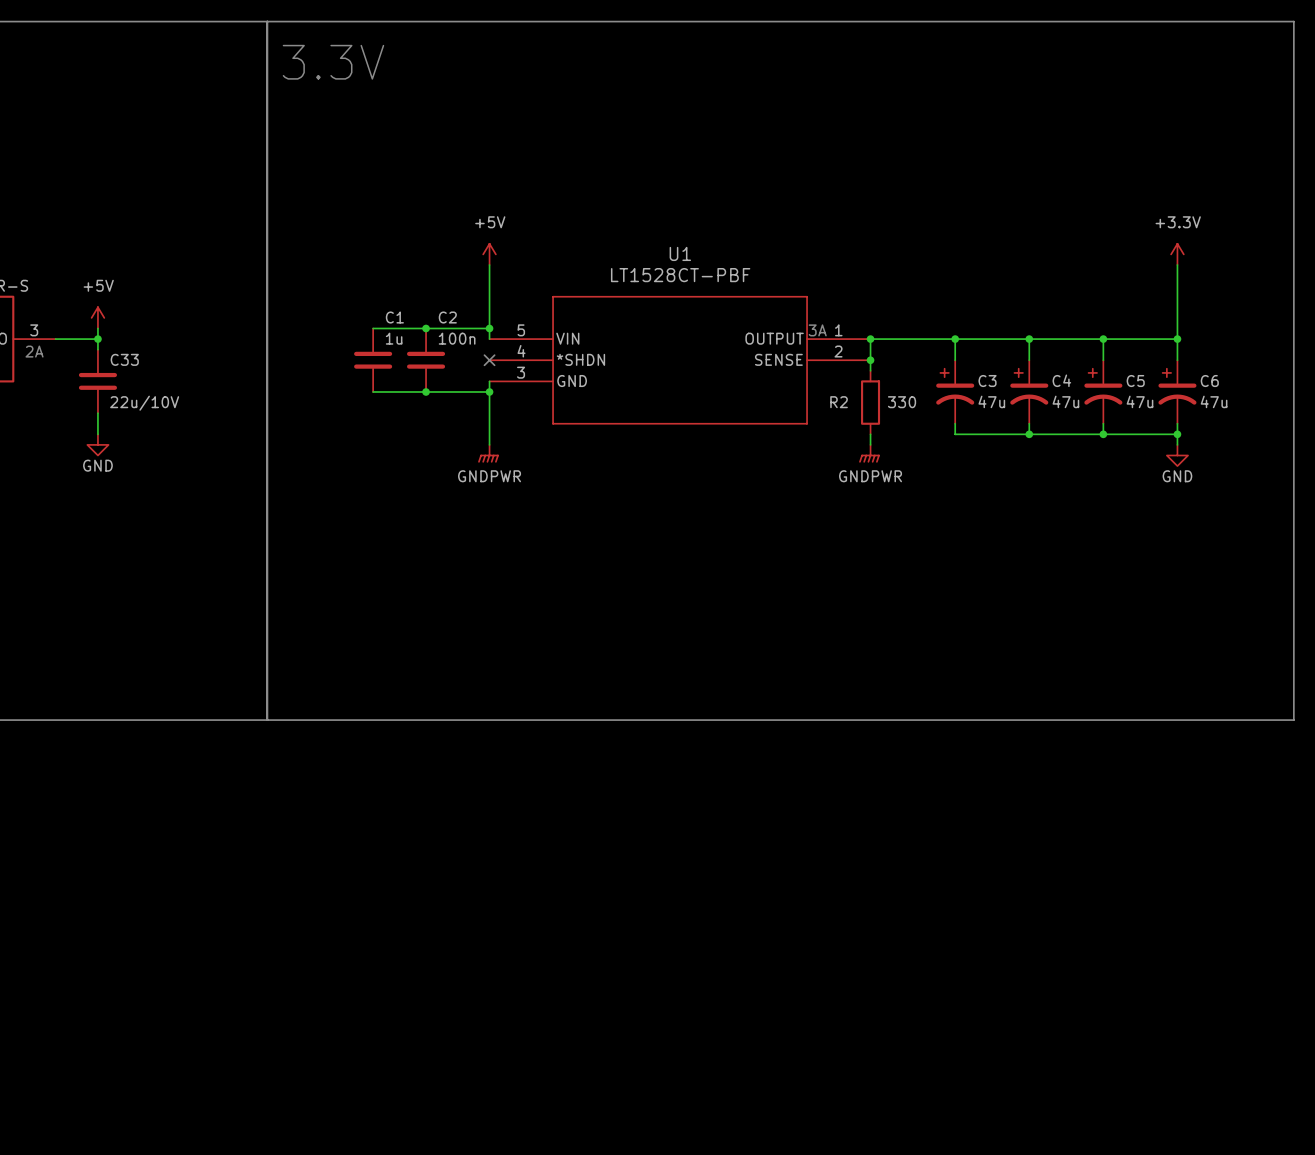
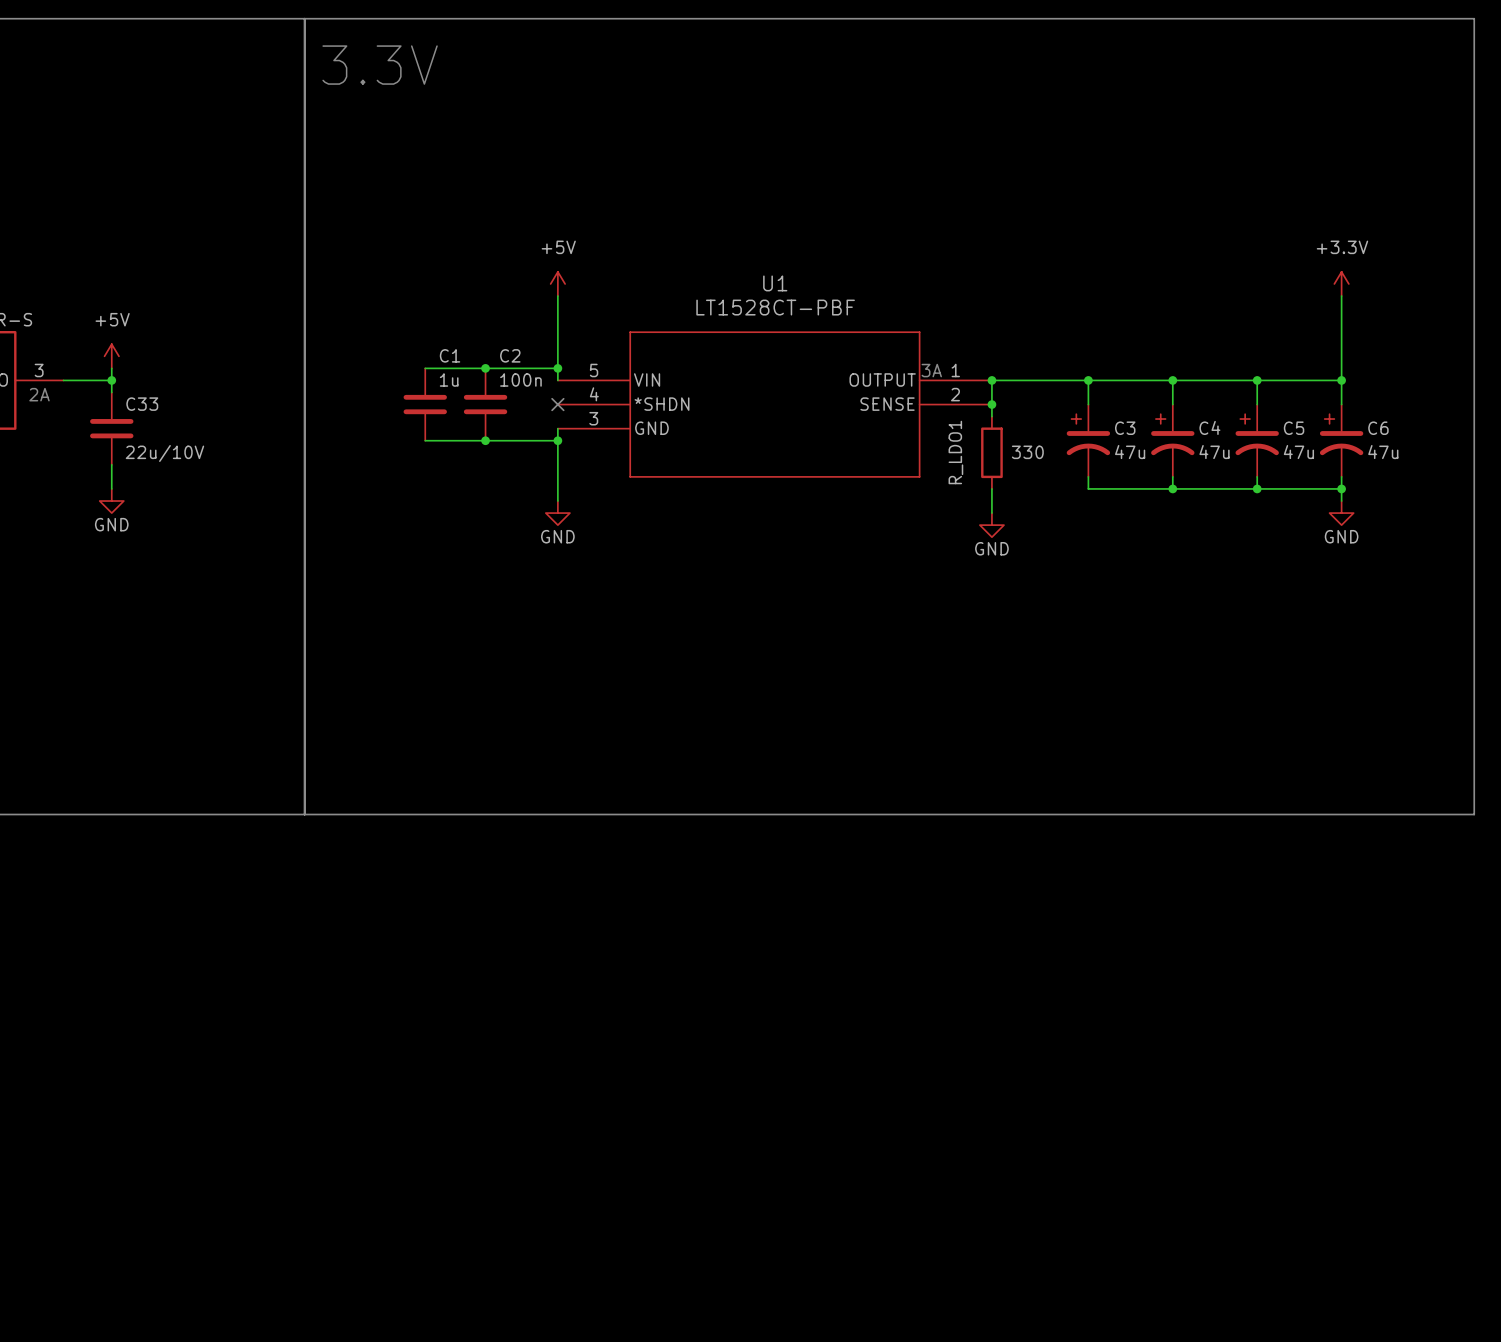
R2 name: R2 (839, 402) -> R_LDO1 (955, 452)
power symbol: GNDPWR (488, 453) -> GND (557, 513)
power symbol: GNDPWR (869, 453) -> none
power symbol: none -> GND (991, 525)

